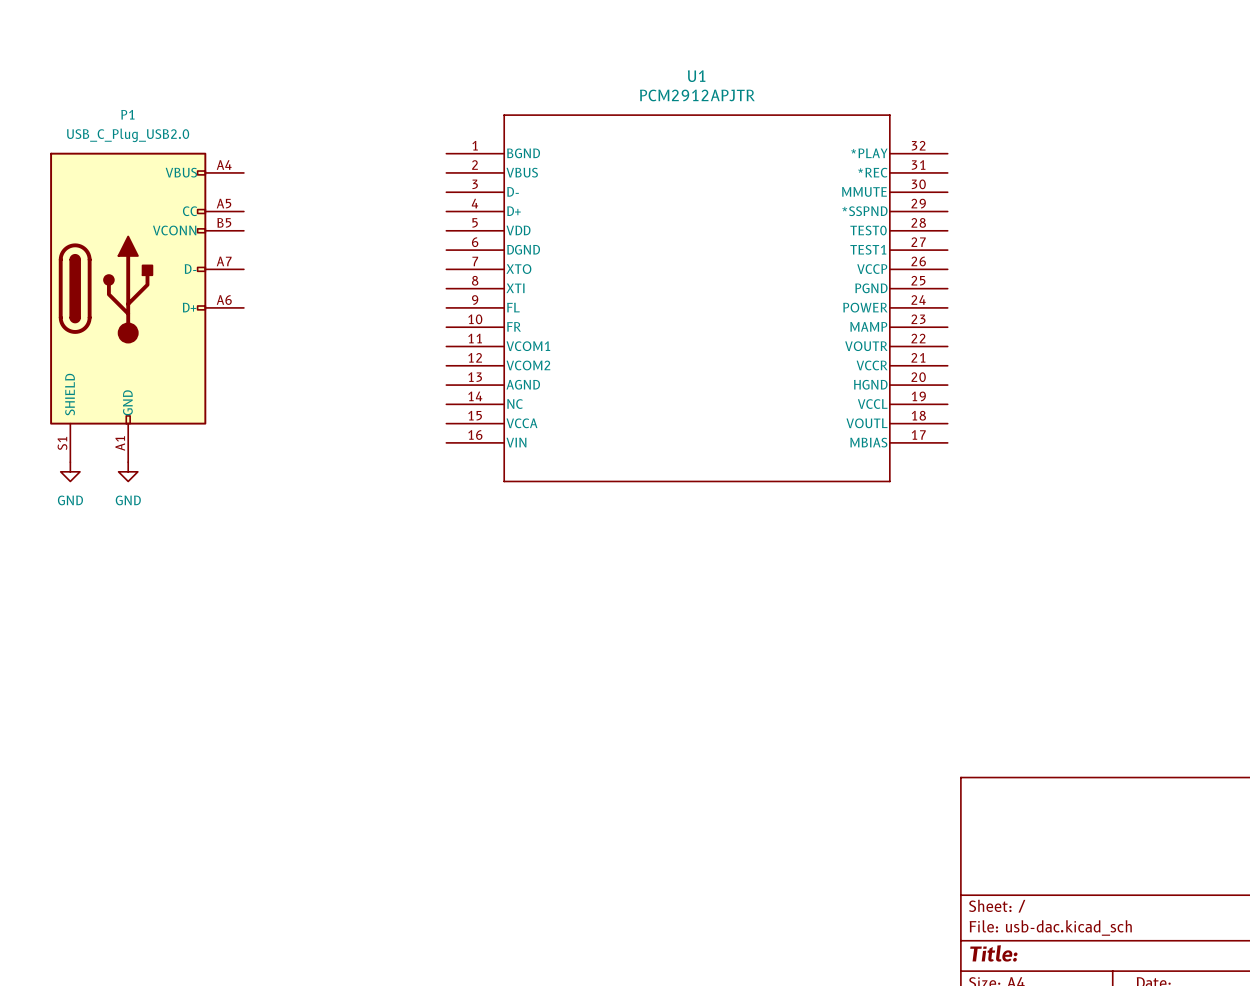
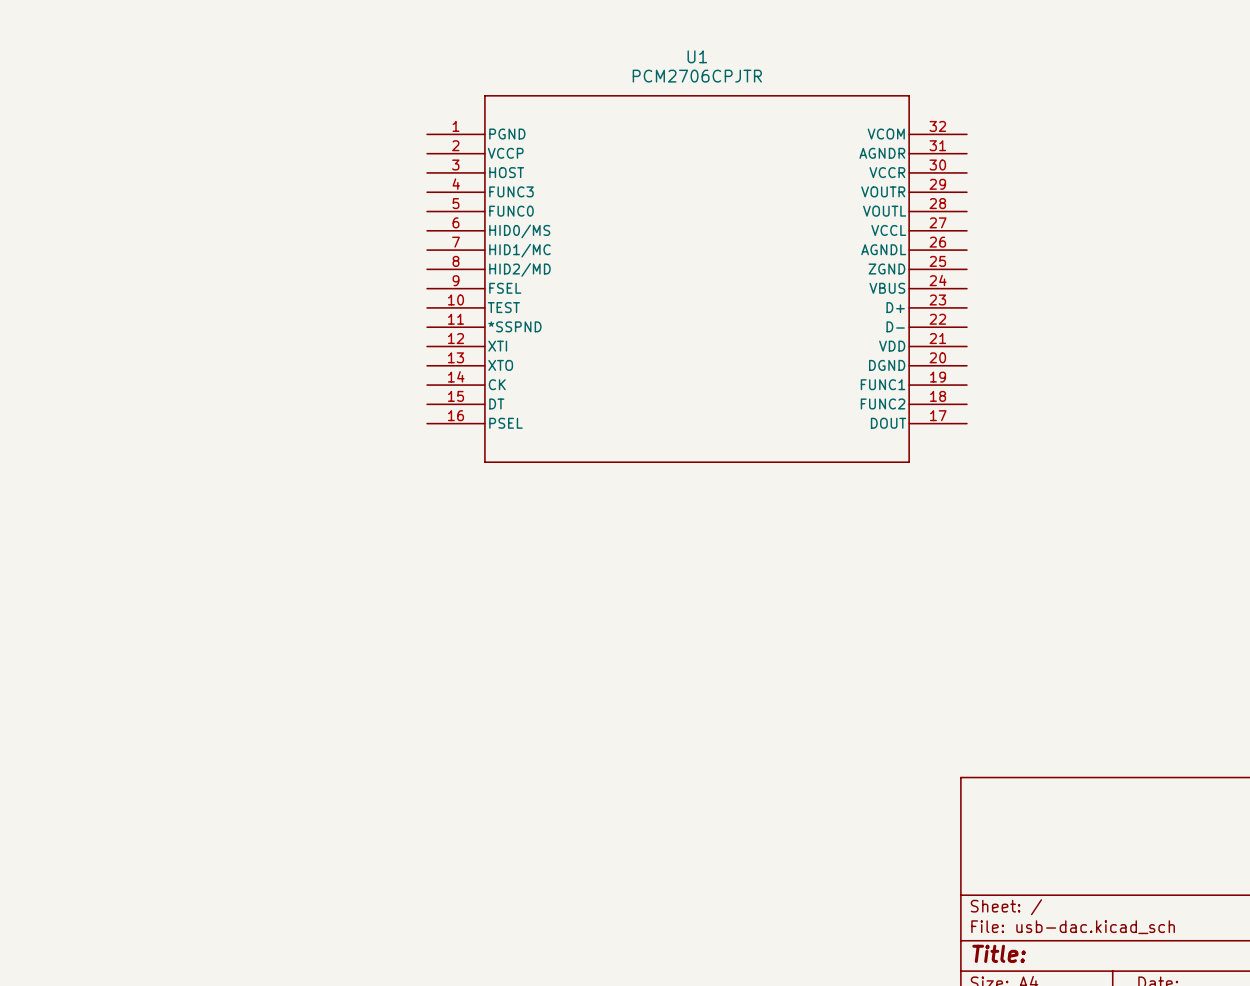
U1 value: PCM2912APJTR (697, 95) -> PCM2706CPJTR (697, 76)
U1 symbol: [446, 114, 948, 482] -> [427, 95, 967, 463]
P1: USB_C_Plug_USB2.0 (147, 307) -> none
power symbol: GND (70, 471) -> none
power symbol: GND (128, 471) -> none

